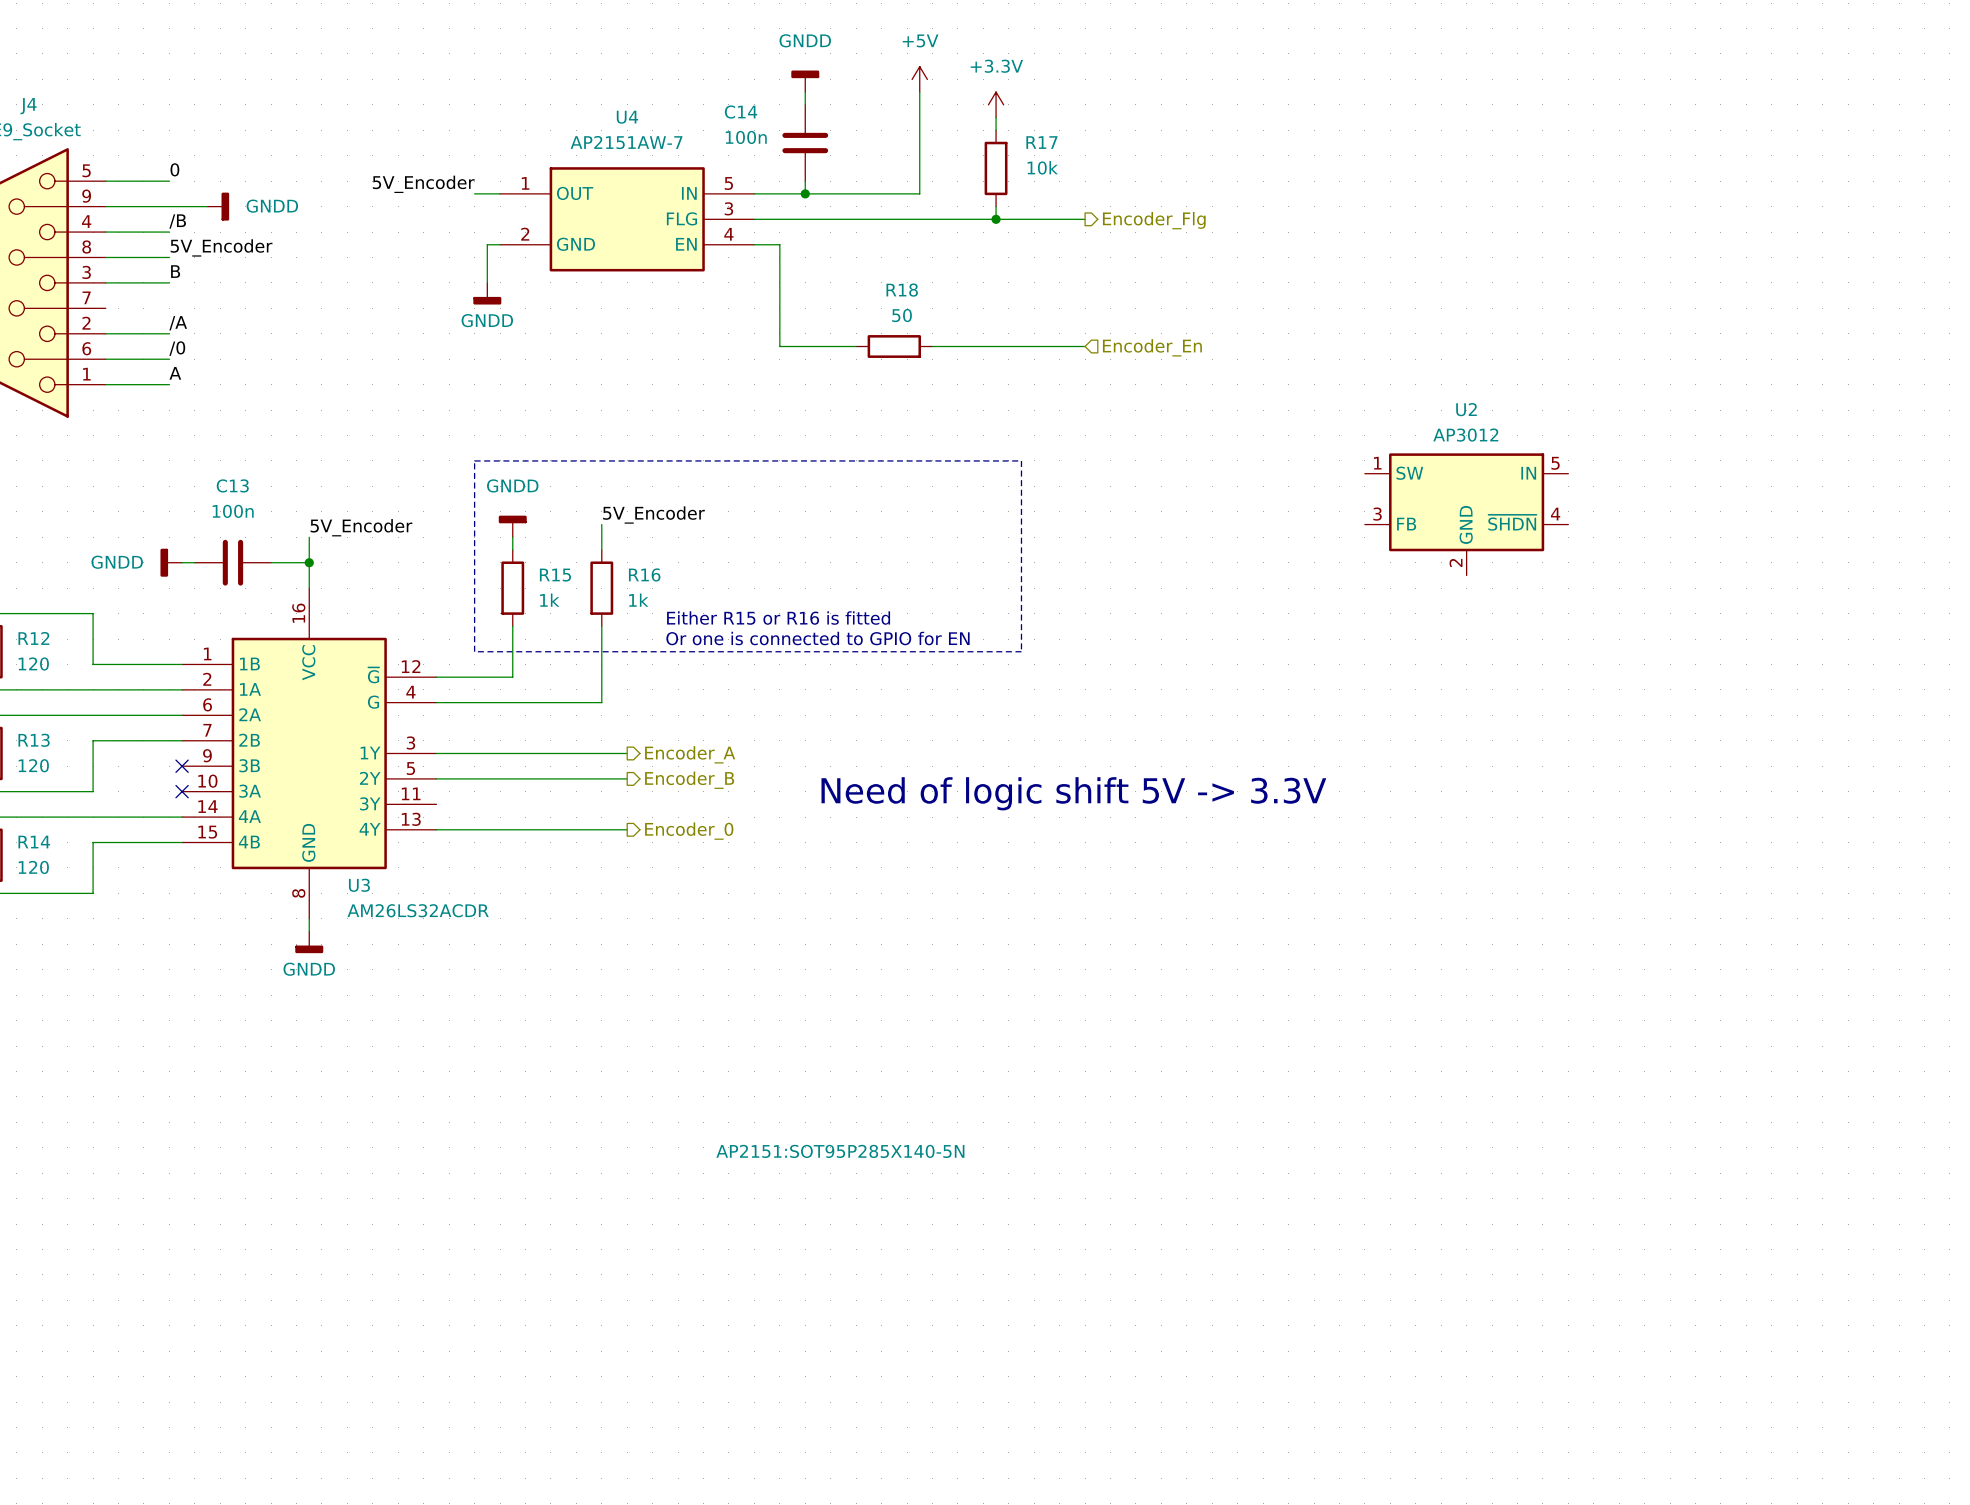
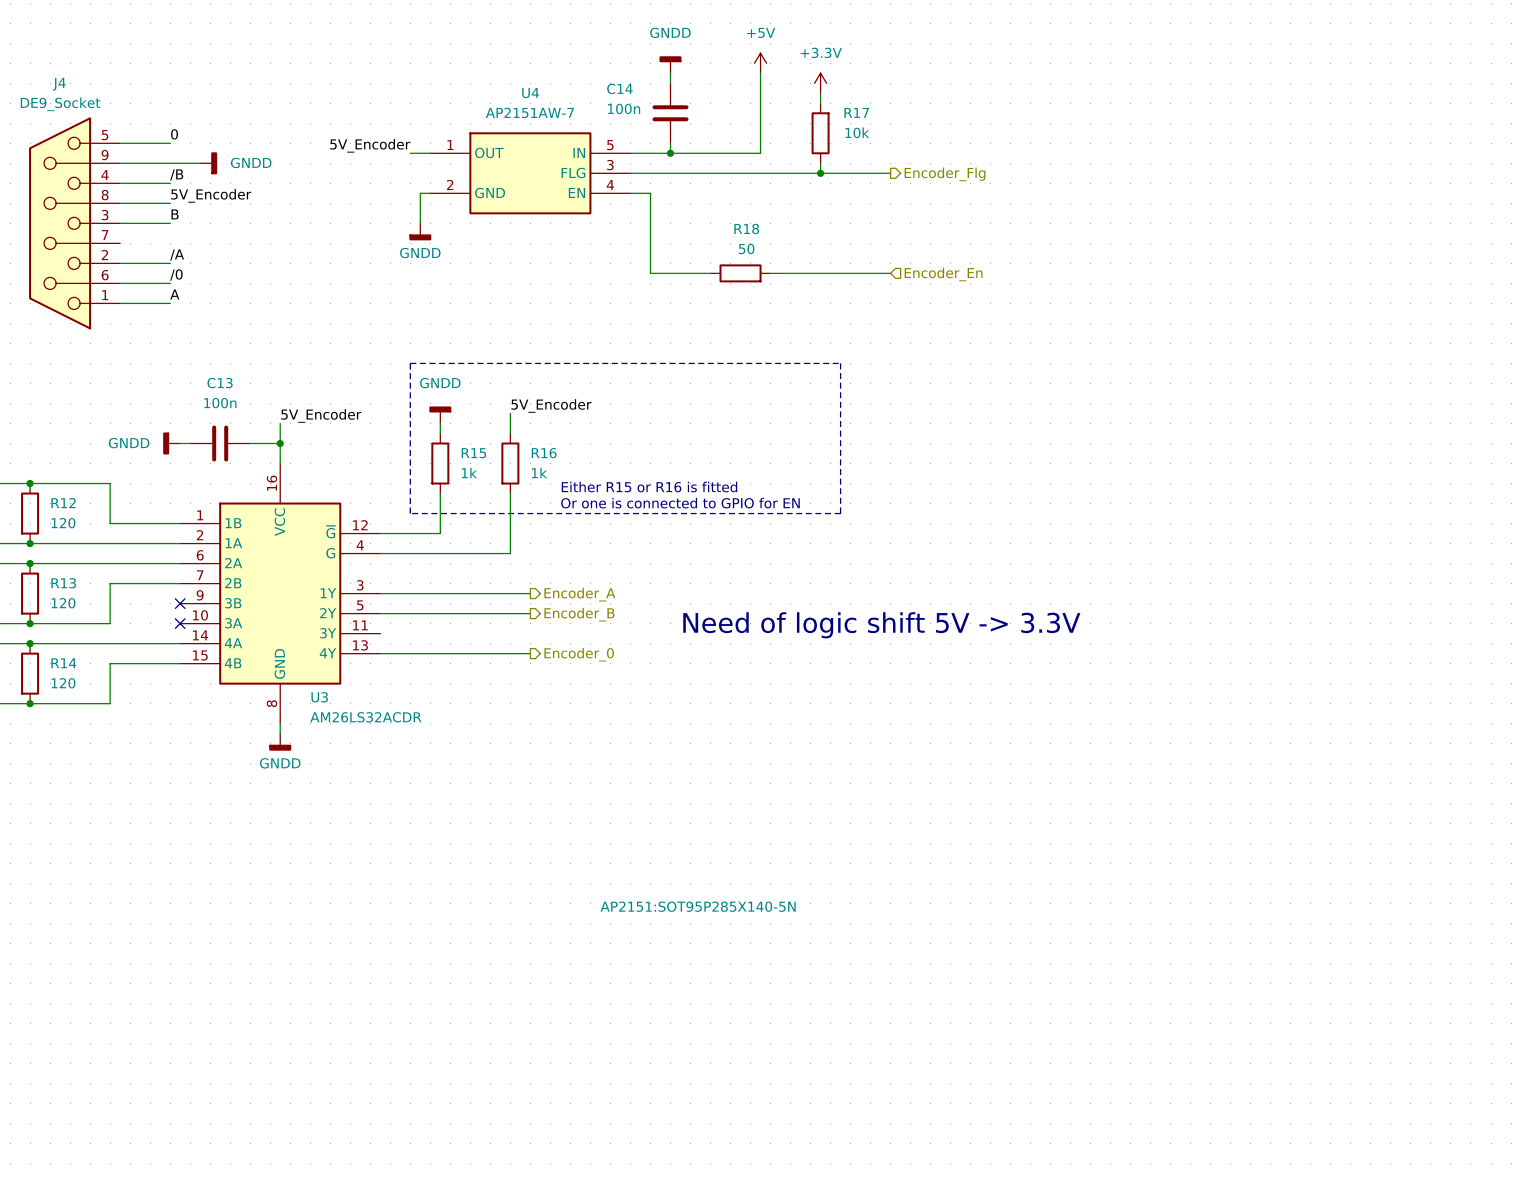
U2: AP3012 (1466, 514) -> none

